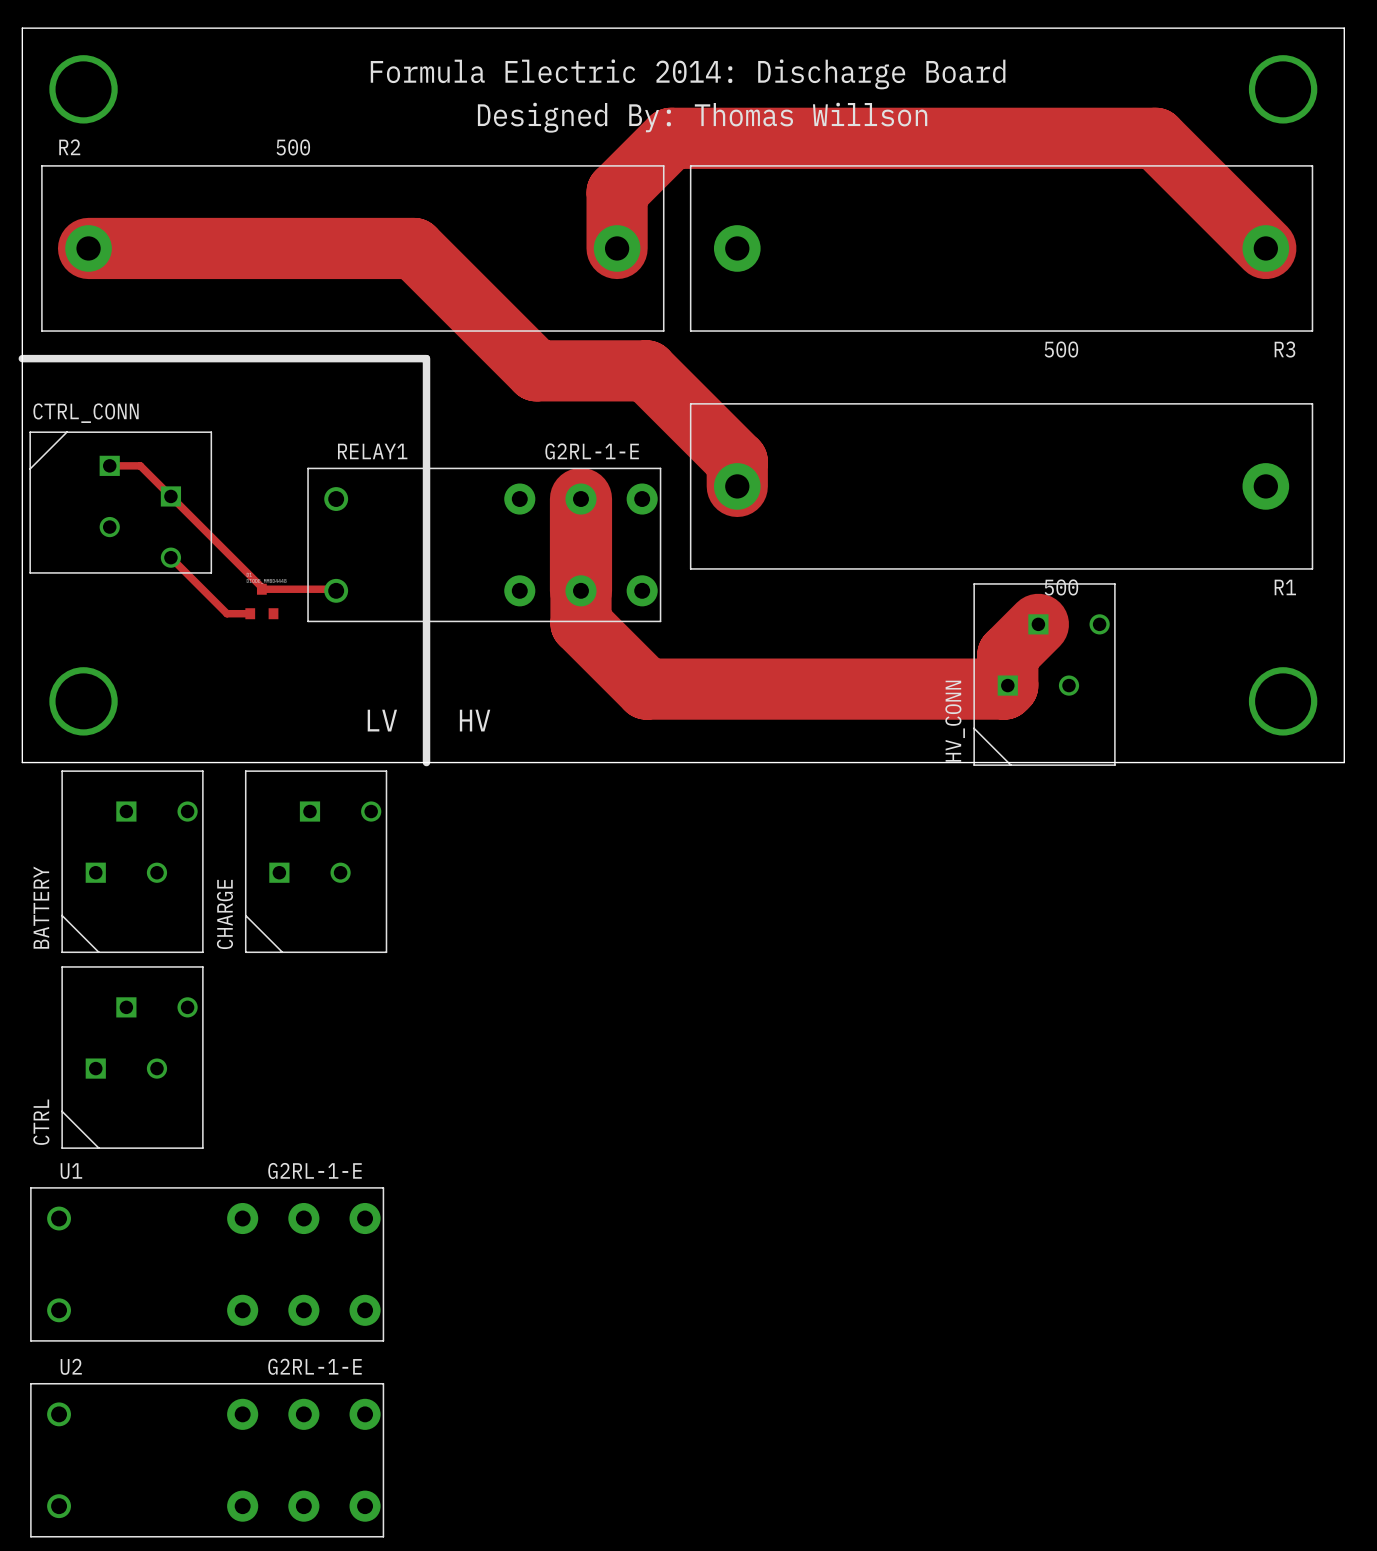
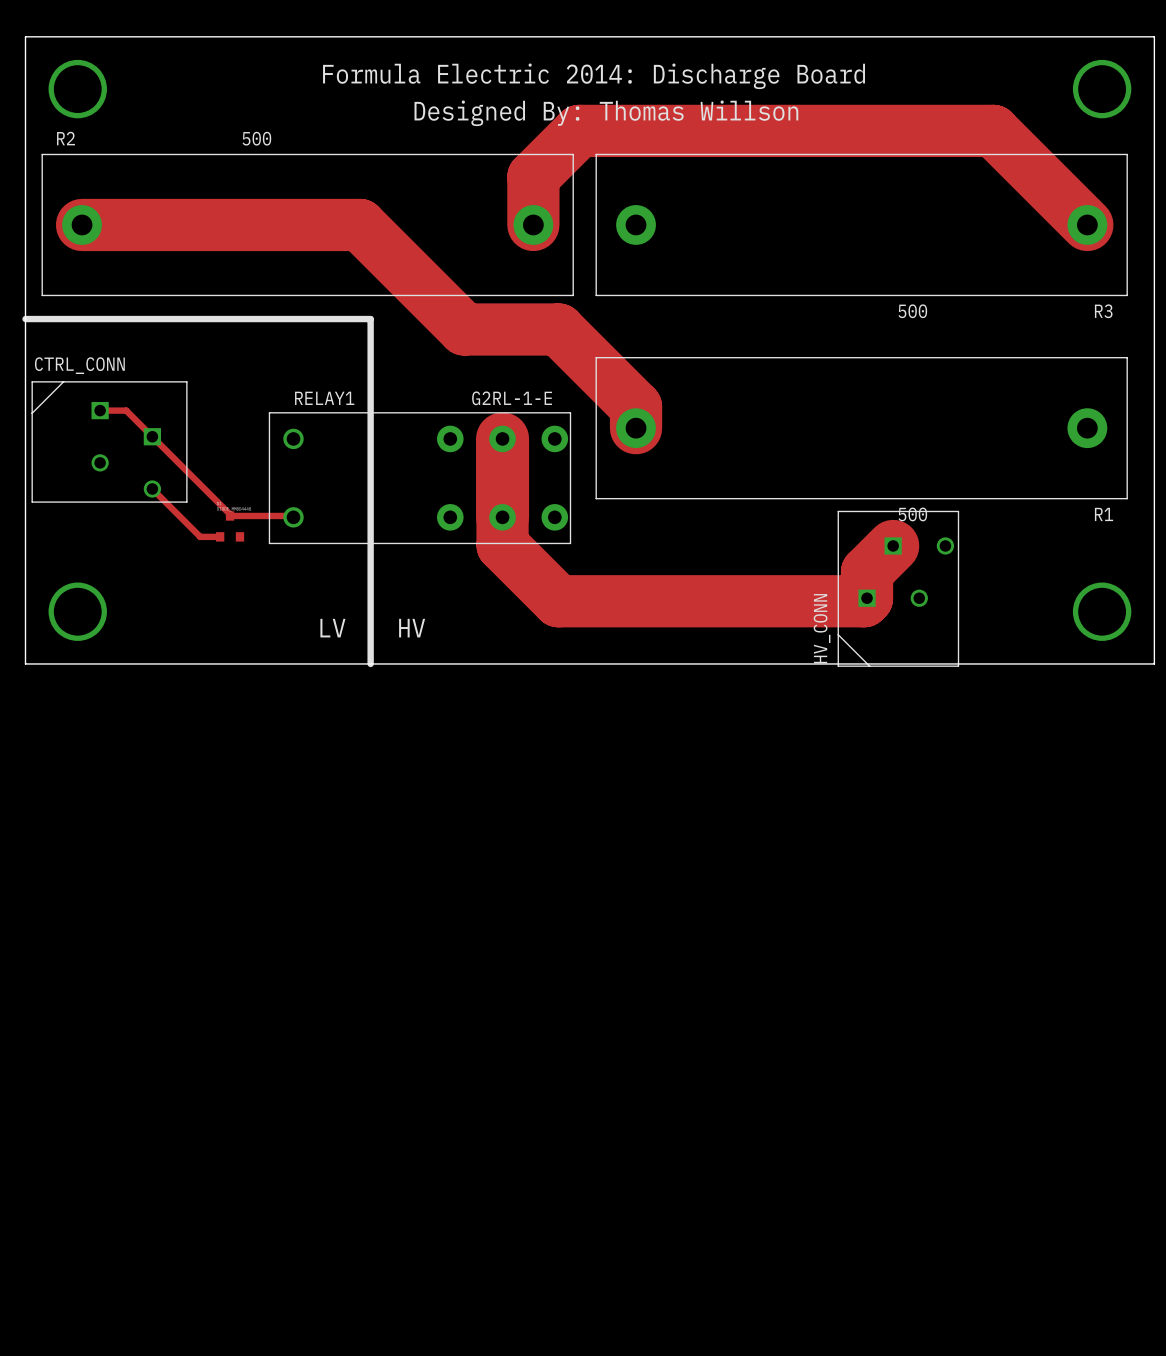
BATTERY: (132, 861) -> none
CHARGE: (316, 861) -> none
CTRL: (132, 1057) -> none
U1: G2RL-1-E (207, 1264) -> none
U2: G2RL-1-E (207, 1460) -> none

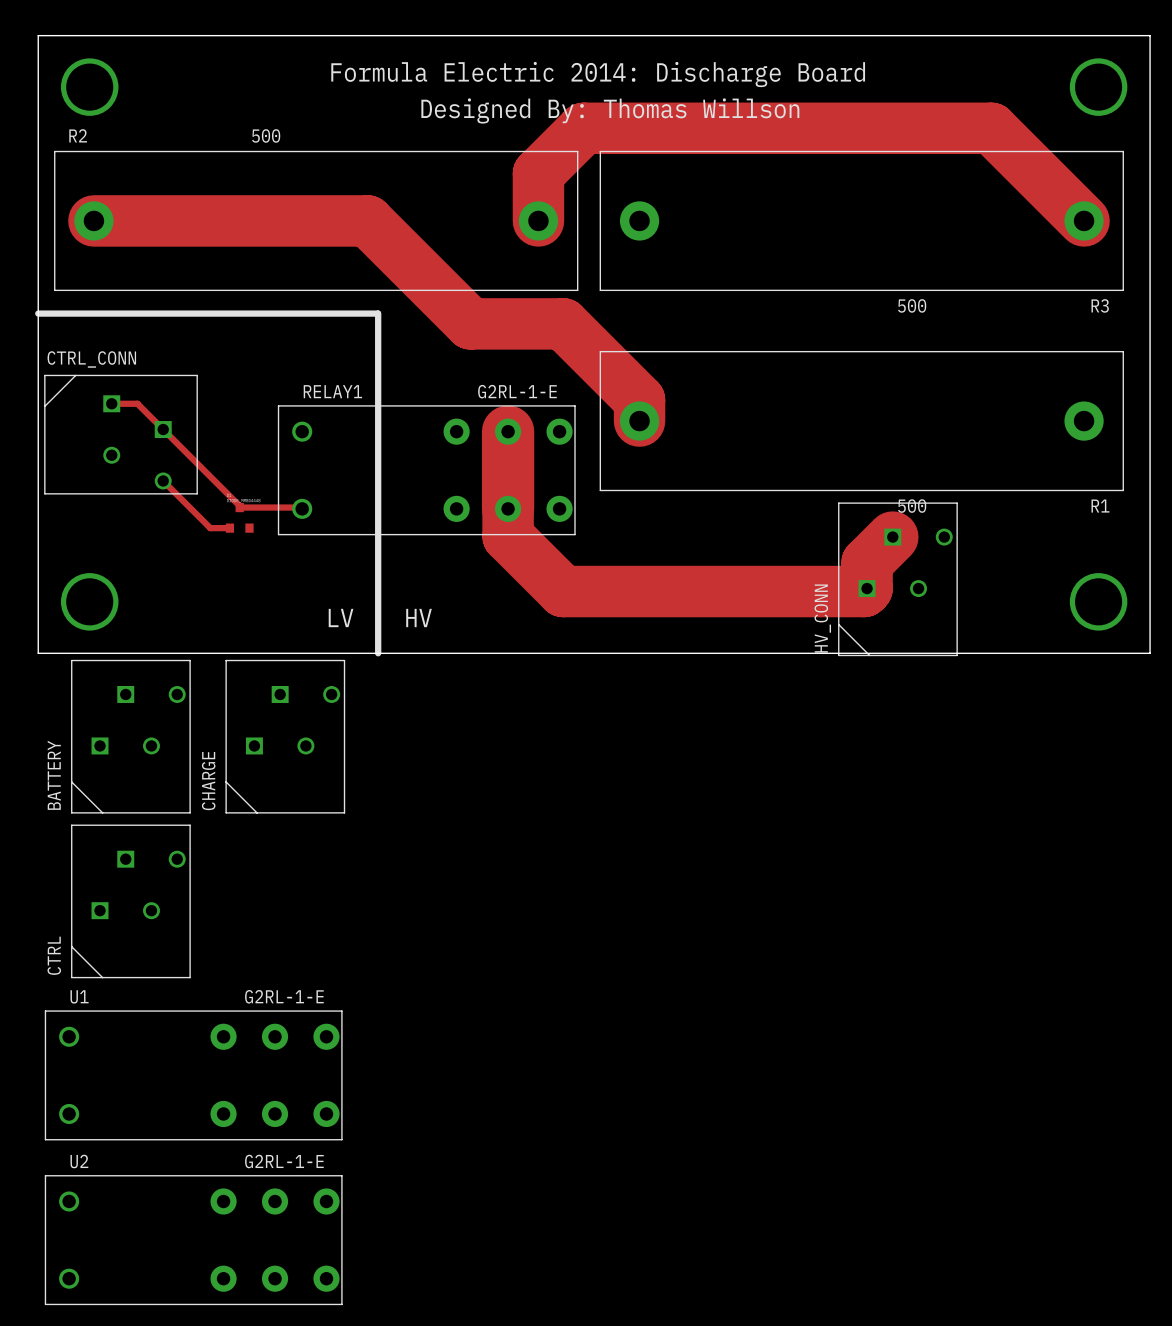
BATTERY: none -> (130, 736)
CHARGE: none -> (285, 736)
CTRL: none -> (130, 901)
U1: none -> G2RL-1-E (193, 1075)
U2: none -> G2RL-1-E (193, 1240)

